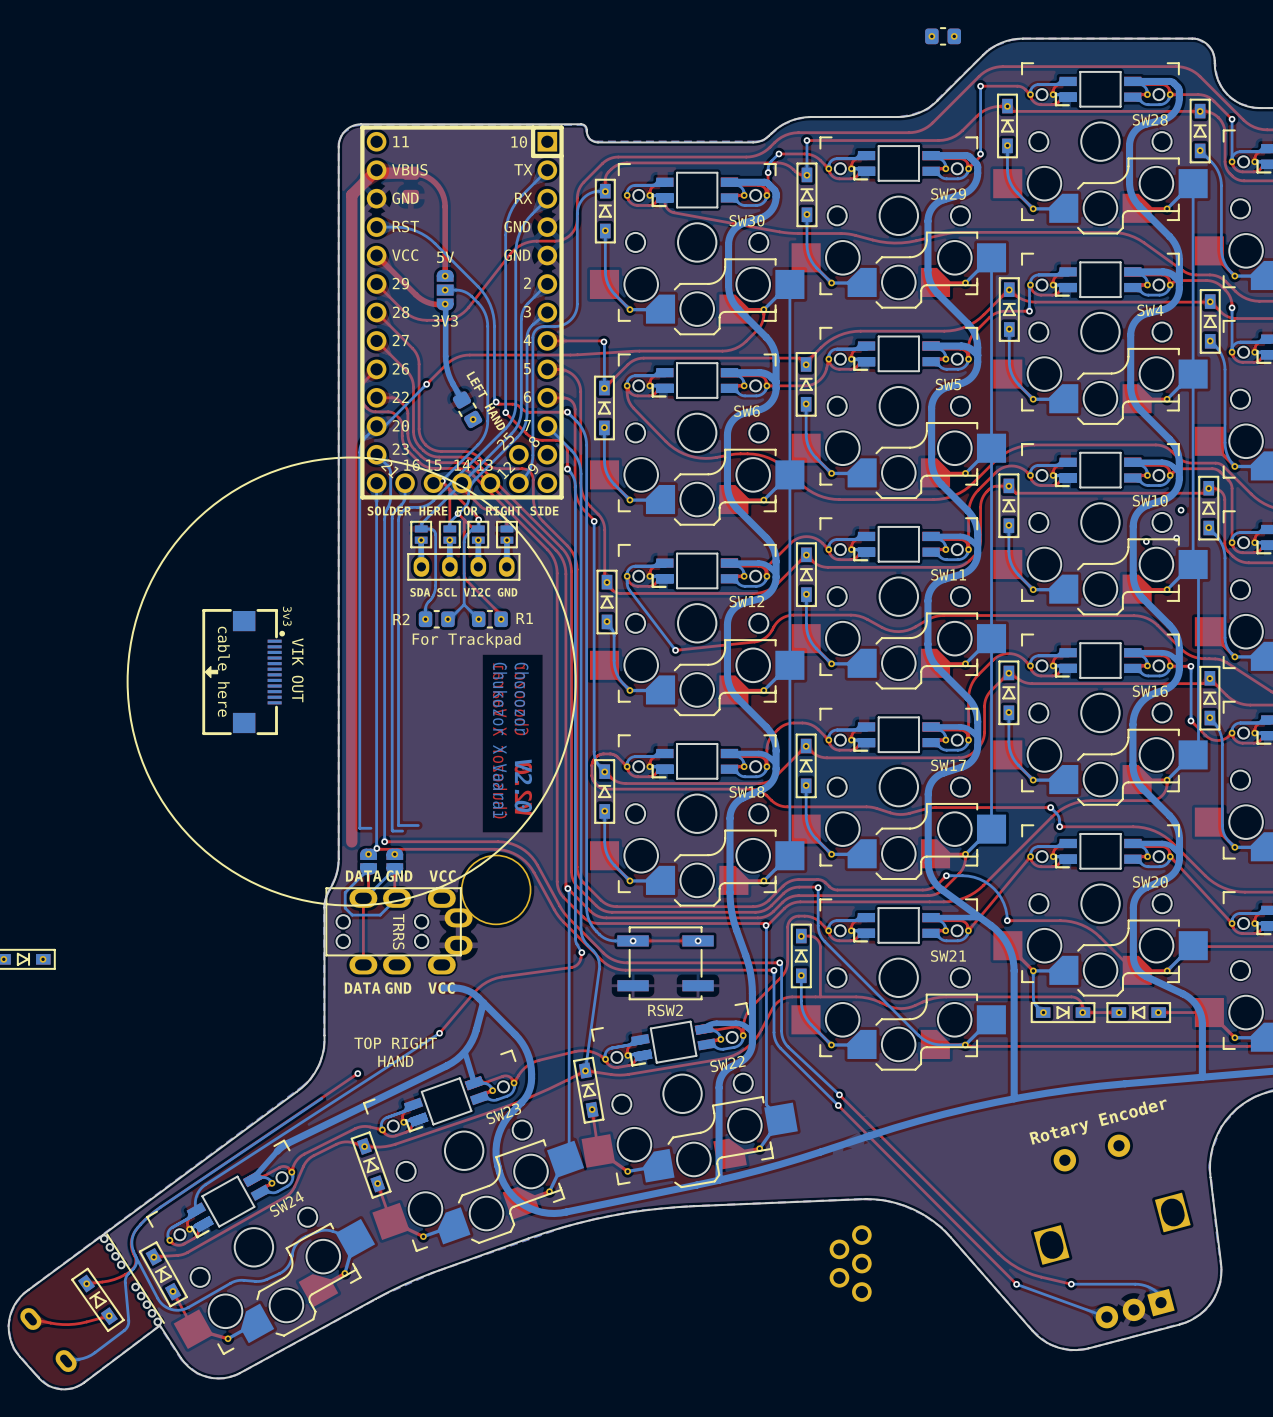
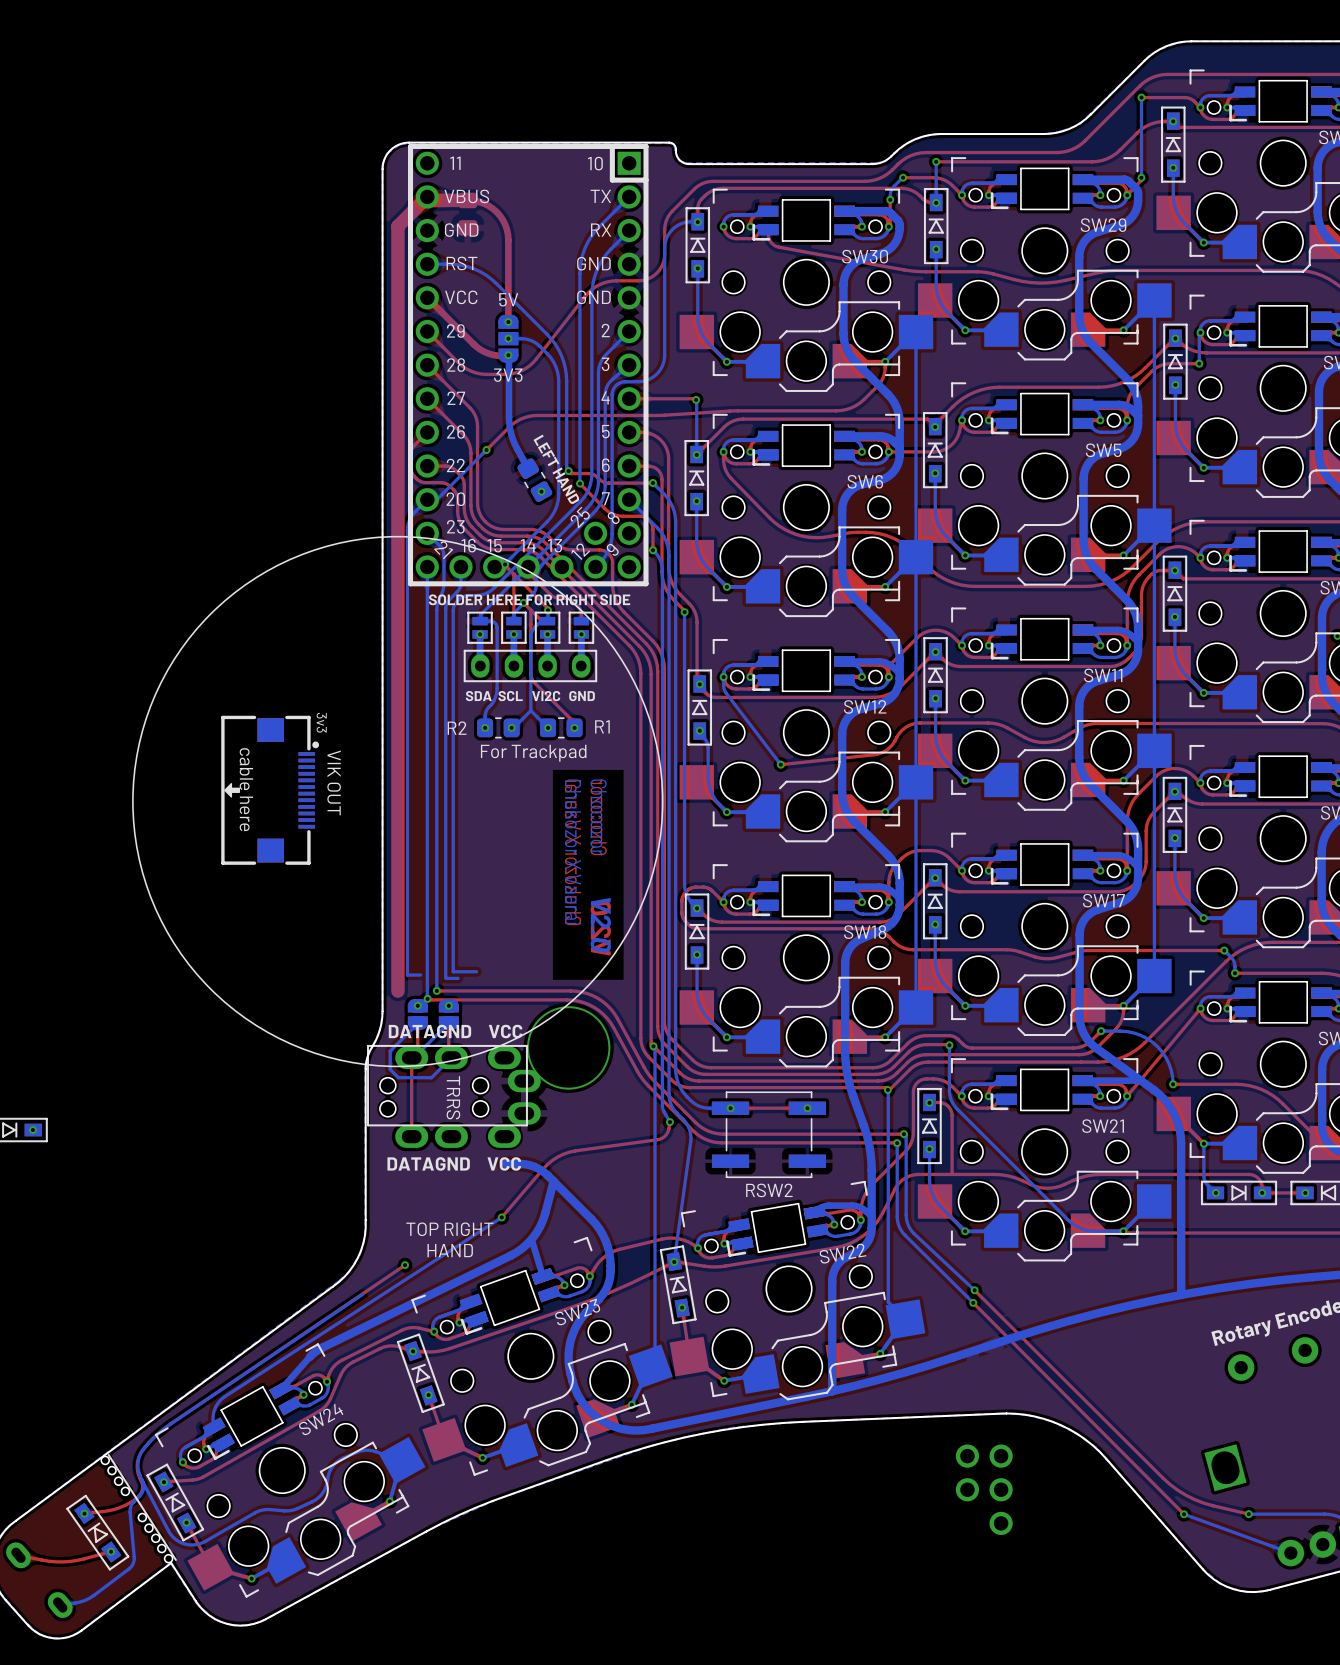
part: (943, 36) -> none
part footprint: [829, 1225, 872, 1302] -> [955, 1444, 1013, 1536]

